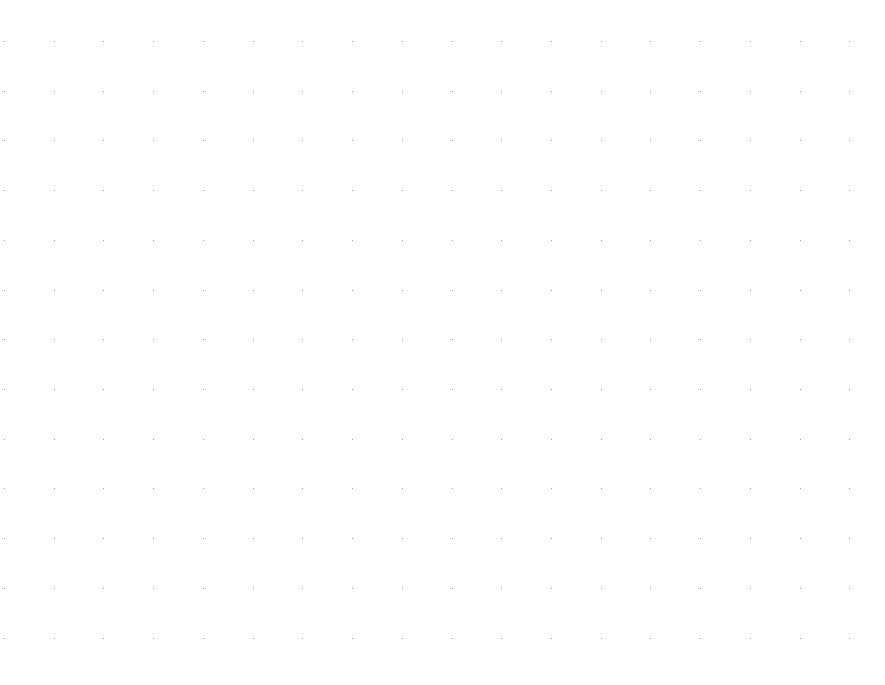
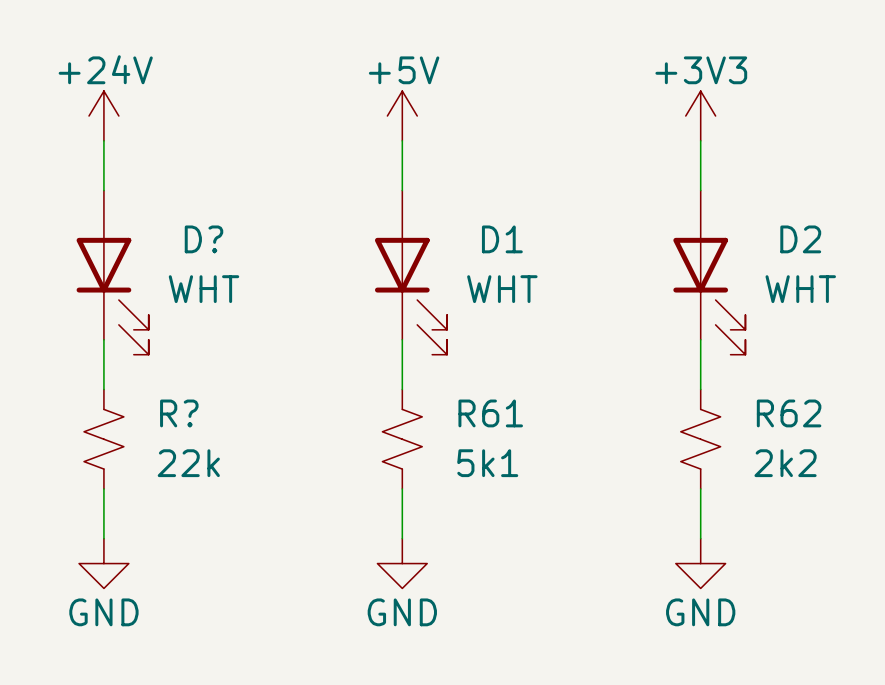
power symbol: none -> +24V (103, 116)
power symbol: none -> +5V (402, 116)
power symbol: none -> +3V3 (700, 116)
wire: none -> (103, 140) (103, 190)
wire: none -> (402, 140) (402, 190)
wire: none -> (700, 140) (700, 190)
D?: none -> WHT (112, 272)
D1: none -> WHT (411, 272)
D2: none -> WHT (709, 272)
wire: none -> (103, 339) (103, 389)
wire: none -> (402, 339) (402, 389)
wire: none -> (700, 339) (700, 389)
R?: none -> 22k (103, 439)
R61: none -> 5k1 (402, 439)
R62: none -> 2k2 (700, 439)
wire: none -> (103, 488) (103, 538)
wire: none -> (402, 488) (402, 538)
wire: none -> (700, 488) (700, 538)
power symbol: none -> GND (103, 563)
power symbol: none -> GND (402, 563)
power symbol: none -> GND (700, 563)

